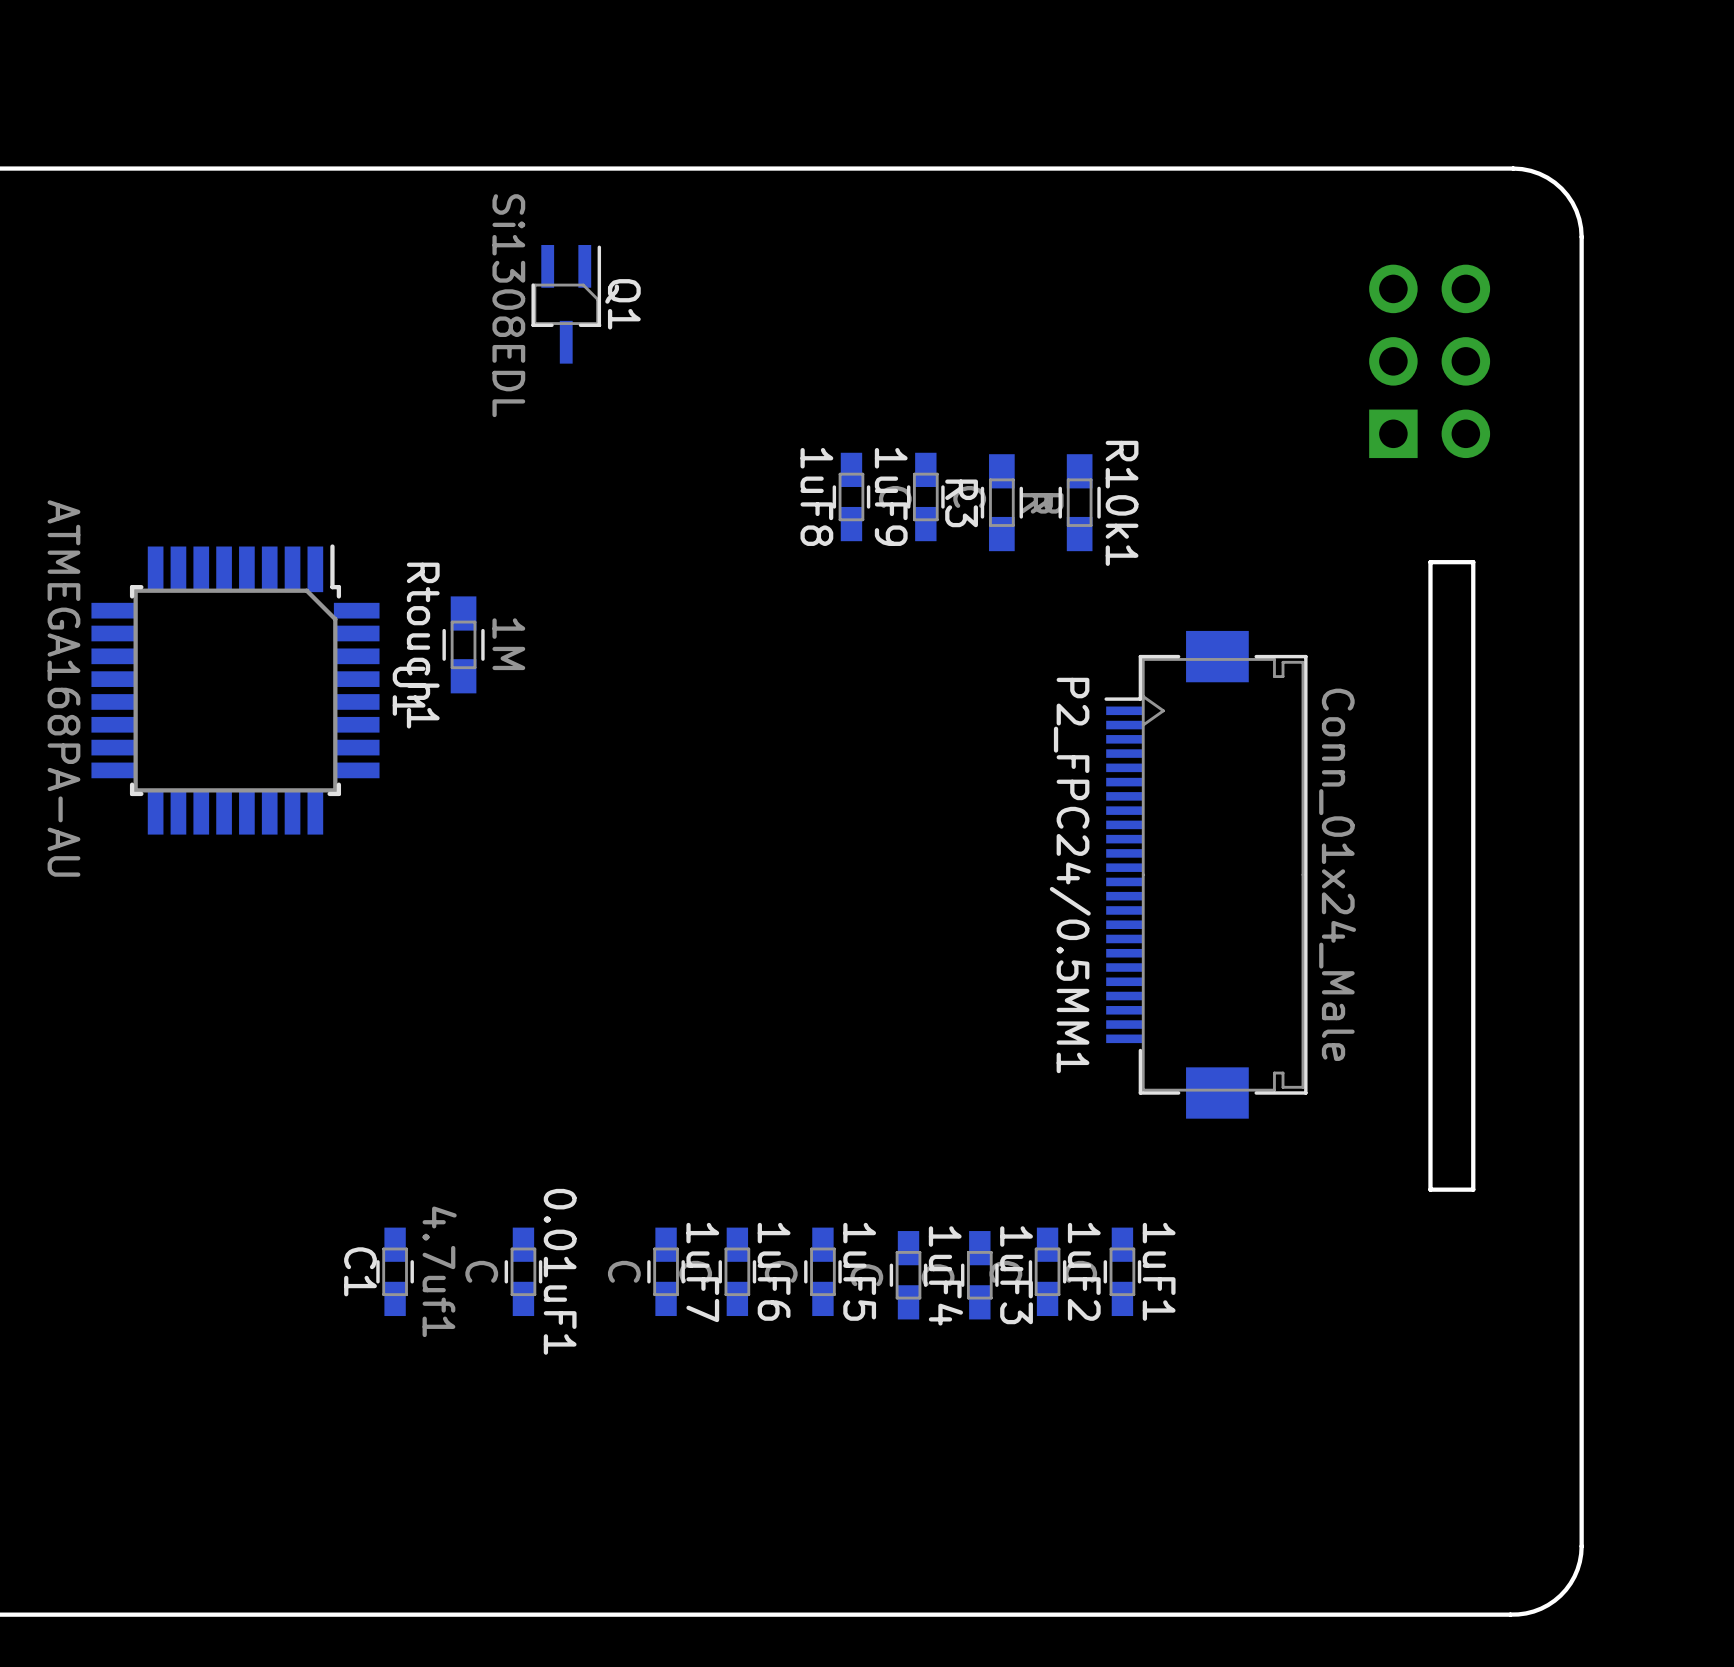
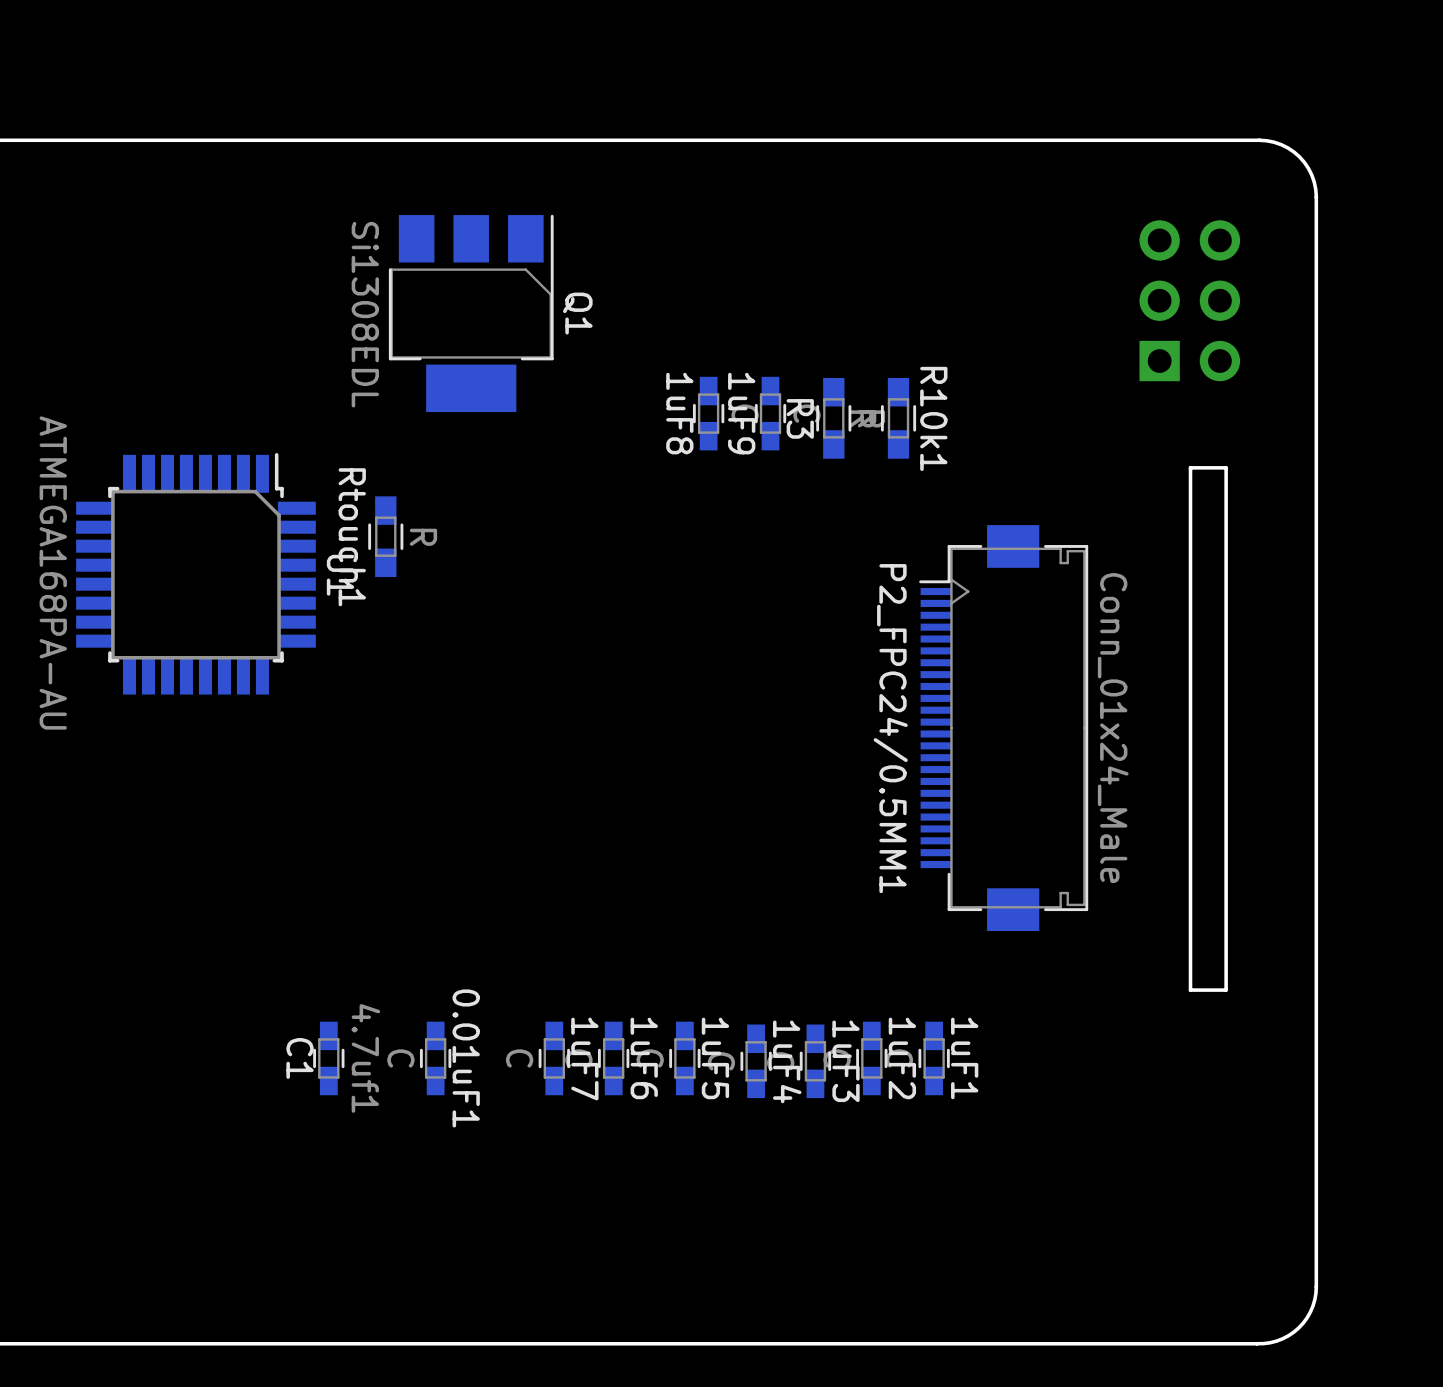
Q1 footprint: [531, 244, 602, 364] -> [388, 214, 554, 413]
Q1 name position: Q1 (622, 304) -> Q1 (577, 313)
Q1 value position: Si1308EDL (508, 305) -> Si1308EDL (365, 314)
Rtouch1 value: 1M (508, 644) -> R (423, 537)

